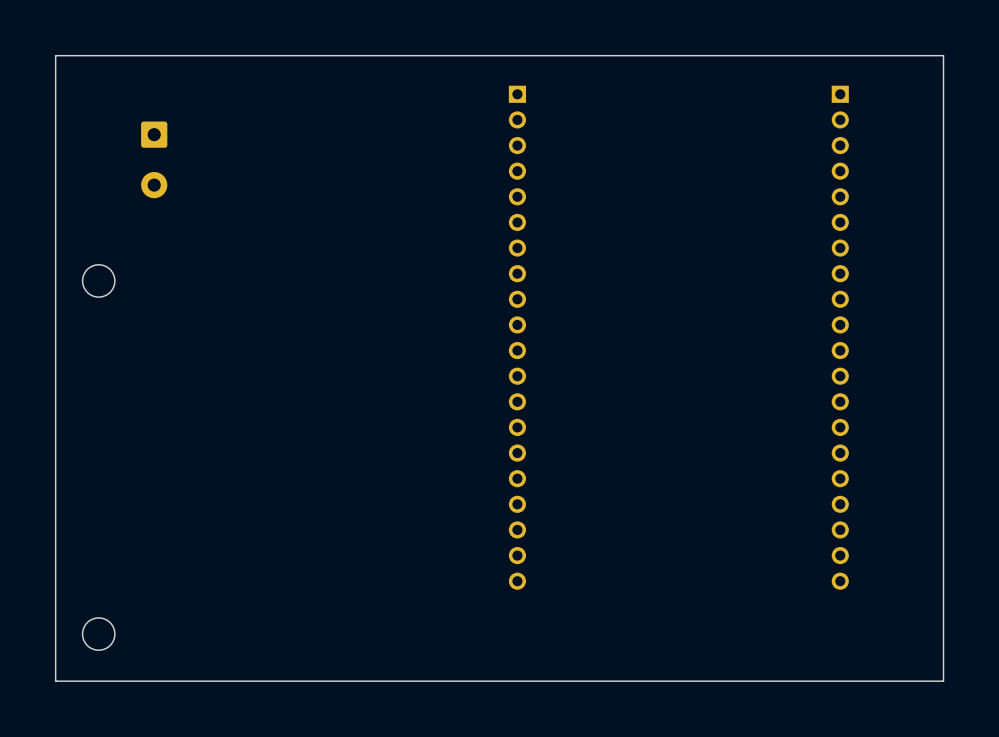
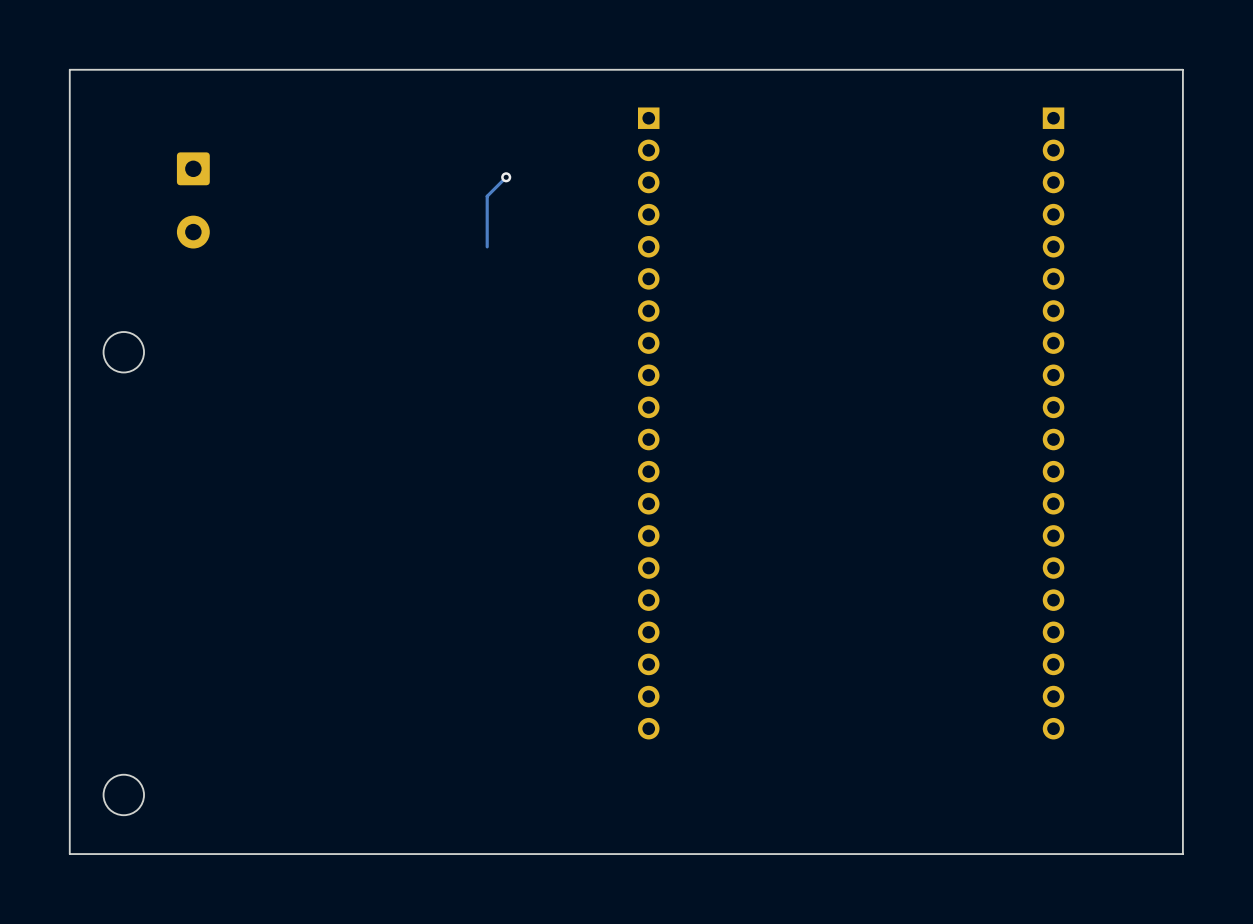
track: none -> (506, 177) (487, 196) (487, 246)
via: none -> (506, 177)

